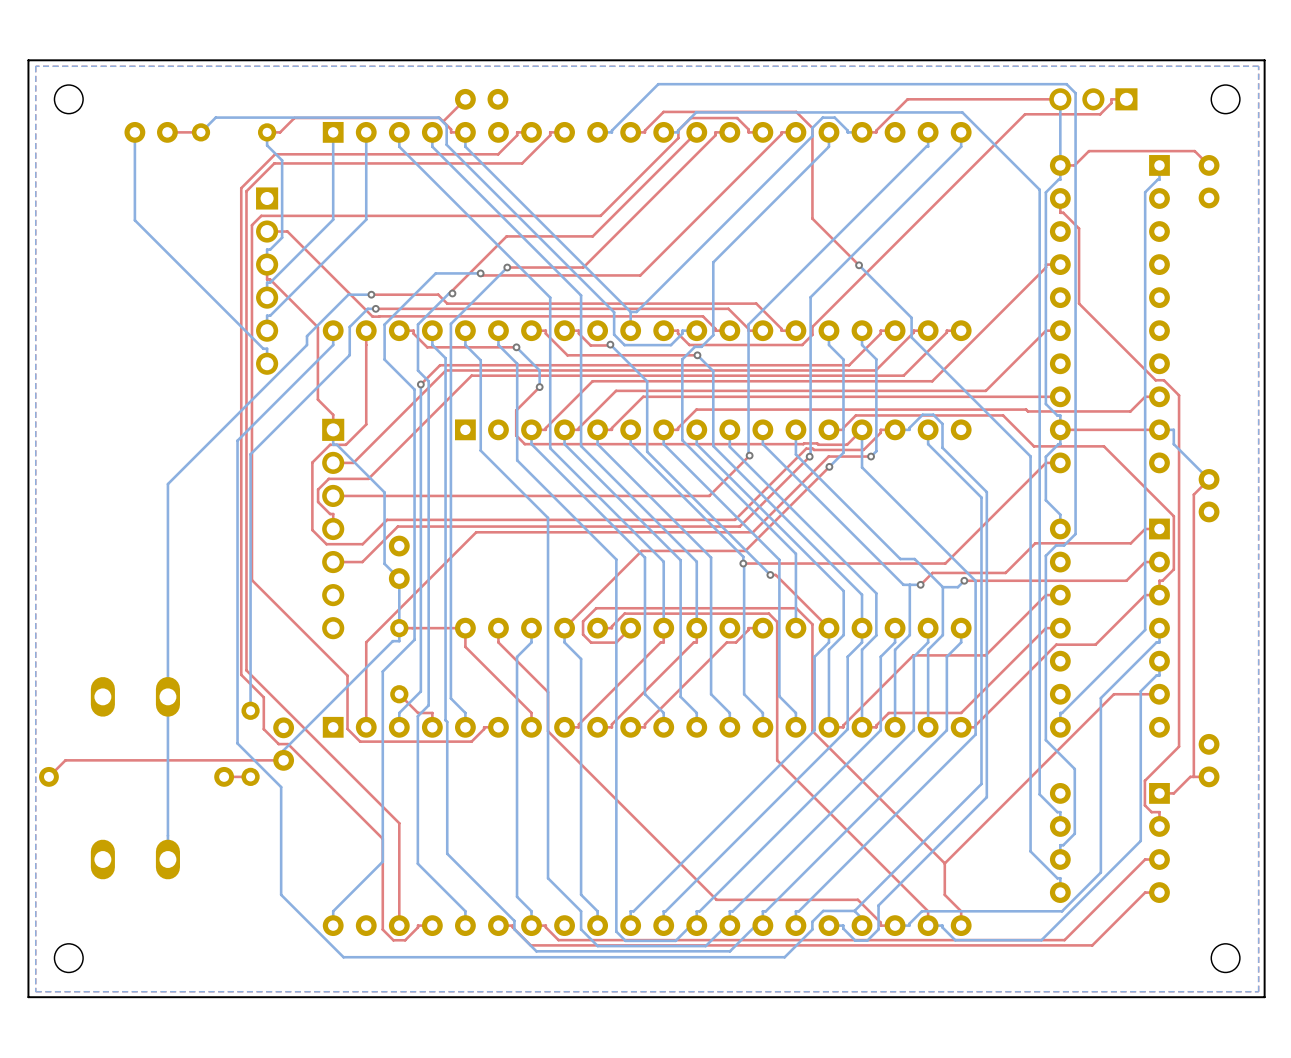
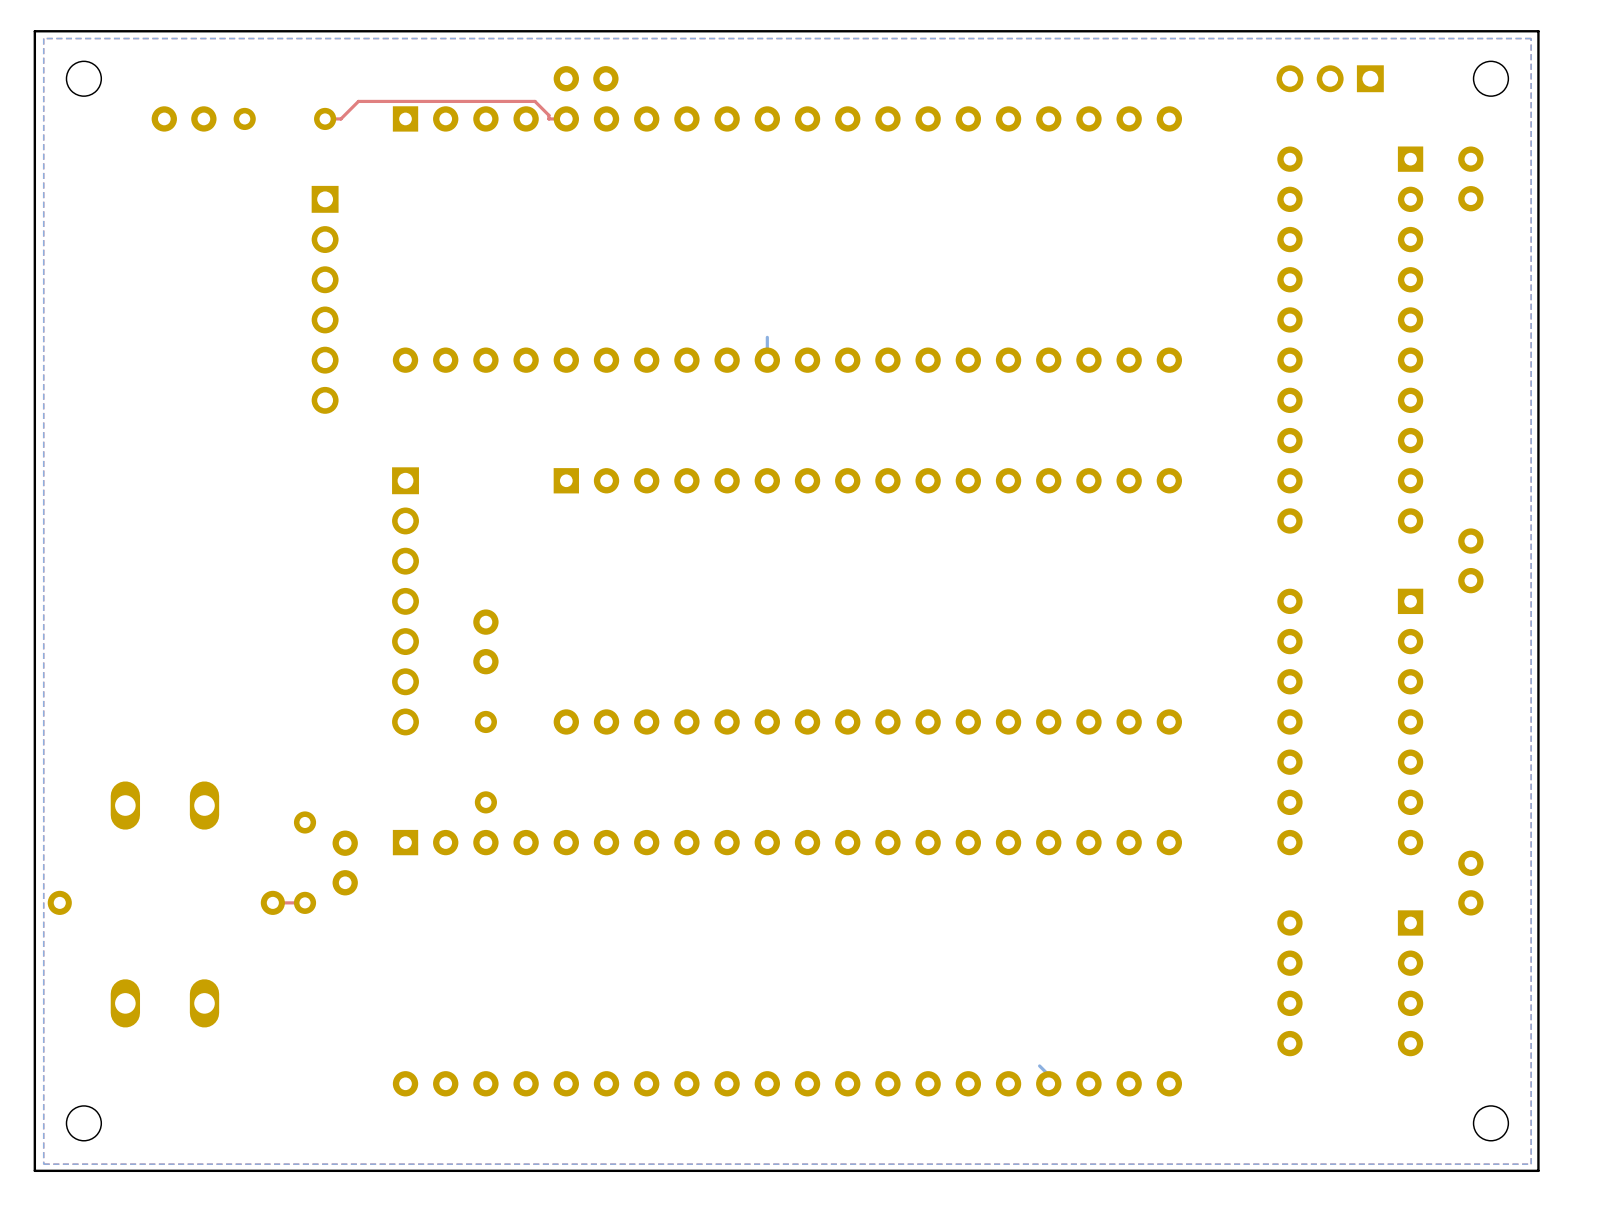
top track: (465, 99) (443, 121) -> none
top track: (1060, 99) (907, 99) (876, 132) (862, 132) -> none
bottom track: (1060, 99) (1060, 179) (1045, 192) (1045, 404) (1057, 415) (1060, 415) (1060, 444) (1045, 456) (1045, 500) (1060, 514) (1060, 529) -> none
top track: (1126, 99) (1111, 99) (1111, 103) (1100, 114) (1025, 114) (812, 326) (812, 334) (802, 345) (689, 345) (678, 333) (678, 330) (663, 330) -> none
bottom track: (134, 132) (134, 220) (263, 348) (267, 348) (267, 363) -> none
top track: (200, 132) (167, 132) -> none
bottom track: (200, 132) (215, 117) (438, 117) (446, 125) (446, 144) (614, 312) (614, 334) (624, 345) (670, 345) (682, 333) (682, 330) (696, 330) -> none
bottom track: (267, 132) (267, 145) (282, 160) (282, 237) (270, 249) (267, 249) (267, 264) -> none
bottom track: (333, 132) (333, 219) (270, 282) (267, 282) (267, 297) -> none
bottom track: (366, 132) (366, 219) (270, 315) (267, 315) (267, 330) -> none
bottom track: (399, 132) (399, 146) (550, 297) (550, 448) (663, 561) (663, 628) -> none
bottom track: (432, 132) (432, 146) (581, 295) (581, 446) (696, 561) (696, 628) -> none
top track: (531, 132) (517, 132) (517, 135) (498, 154) (275, 154) (241, 188) (241, 674) (263, 697) (263, 729) (278, 744) (288, 744) (382, 838) (382, 929) (393, 940) (405, 940) (418, 925) (432, 925) -> none
top track: (564, 132) (550, 132) (550, 135) (522, 163) (274, 163) (246, 191) (246, 670) (399, 823) (399, 925) -> none
bottom track: (597, 132) (611, 132) (658, 84) (1066, 84) (1075, 93) (1075, 534) (1064, 545) (1056, 545) (1045, 555) (1045, 740) (1074, 769) (1074, 833) (1063, 845) (1060, 845) (1060, 859) -> none
top track: (630, 132) (644, 132) (663, 111) (796, 111) (812, 128) (812, 218) (859, 265) -> none
bottom track: (663, 132) (678, 132) (696, 112) (962, 112) (1039, 189) (1039, 794) (1057, 812) (1060, 812) (1060, 826) -> none
top track: (696, 132) (592, 236) (506, 236) (452, 290) (452, 293) -> none
top track: (729, 132) (715, 132) (715, 135) (583, 267) (507, 267) -> none
top track: (762, 132) (748, 132) (748, 129) (737, 118) (690, 118) (678, 130) (678, 138) (600, 215) (261, 215) (251, 225) (251, 580) (347, 675) (347, 728) (360, 741) (471, 741) (484, 727) (498, 727) -> none
top track: (795, 132) (781, 132) (640, 275) (482, 275) (480, 273) -> none
bottom track: (828, 132) (828, 146) (713, 262) (713, 335) (701, 346) (694, 346) (682, 359) (682, 440) (795, 553) (795, 628) -> none
bottom track: (862, 132) (847, 132) (834, 117) (822, 117) (812, 127) (812, 136) (636, 311) (630, 311) (465, 146) (465, 132) -> none
bottom track: (928, 132) (928, 146) (748, 324) (749, 455) -> none
bottom track: (961, 132) (961, 146) (810, 297) (809, 456) -> none
bottom track: (1159, 165) (1159, 179) (1145, 192) (1145, 629) (1060, 712) (1060, 727) -> none
top track: (1209, 165) (1194, 151) (1088, 151) (1074, 165) (1060, 165) -> none
top track: (1060, 198) (1060, 212) (1063, 212) (1079, 228) (1079, 303) (1155, 380) (1163, 380) (1179, 395) (1179, 746) (1144, 780) (1144, 805) (1151, 812) (1159, 812) (1159, 826) -> none
top track: (267, 231) (287, 231) (372, 316) (702, 316) (715, 330) (729, 330) -> none
top track: (267, 264) (267, 279) (270, 279) (317, 327) (317, 399) (333, 414) (333, 429) -> none
top track: (1060, 264) (1046, 264) (1046, 267) (932, 381) (592, 381) (545, 429) (531, 429) -> none
bottom track: (859, 265) (911, 317) (911, 337) (1030, 456) (1030, 851) (1057, 878) (1060, 878) (1060, 892) -> none
via: (859, 265) -> none
bottom track: (507, 267) (450, 323) (450, 698) (465, 712) (465, 727) -> none
via: (507, 267) -> none
bottom track: (480, 273) (435, 273) (384, 324) (384, 359) (414, 389) (414, 639) (382, 671) (382, 861) (333, 911) (333, 925) -> none
via: (480, 273) -> none
bottom track: (452, 293) (449, 293) (417, 324) (417, 370) (428, 381) (428, 705) (417, 716) (417, 863) (465, 911) (465, 925) -> none
via: (452, 293) -> none
top track: (371, 294) (438, 294) (447, 303) (756, 303) (781, 330) (795, 330) -> none
bottom track: (371, 294) (348, 294) (307, 336) (307, 345) (167, 484) (167, 859) -> none
via: (371, 294) -> none
top track: (375, 308) (728, 308) (748, 330) (762, 330) -> none
bottom track: (375, 308) (367, 308) (349, 326) (349, 355) (250, 454) (250, 710) -> none
via: (375, 308) -> none
bottom track: (333, 330) (333, 345) (237, 440) (237, 743) (281, 787) (281, 894) (343, 957) (784, 957) (812, 929) (812, 921) (823, 910) (854, 910) (981, 783) (981, 497) (928, 444) (928, 429) -> none
top track: (366, 330) (366, 424) (345, 444) (330, 444) (312, 462) (312, 530) (326, 544) (362, 544) (387, 519) (735, 519) (806, 448) (863, 449) (880, 432) (880, 429) (895, 429) -> none
top track: (399, 330) (413, 330) (413, 333) (427, 347) (516, 347) -> none
bottom track: (432, 330) (432, 345) (445, 358) (447, 853) (514, 920) (514, 929) (536, 951) (730, 951) (762, 918) -> none
bottom track: (465, 330) (465, 345) (480, 360) (480, 450) (548, 517) (548, 878) (581, 911) (581, 929) (597, 946) (705, 946) (729, 922) -> none
bottom track: (498, 330) (498, 345) (517, 363) (517, 460) (616, 559) (616, 931) (625, 940) (675, 940) (696, 919) -> none
top track: (531, 330) (545, 330) (545, 333) (567, 355) (697, 355) -> none
top track: (564, 330) (578, 330) (578, 333) (590, 345) (610, 344) -> none
bottom track: (828, 330) (828, 345) (843, 359) (843, 452) (829, 466) -> none
bottom track: (862, 330) (862, 345) (876, 359) (876, 451) (871, 456) -> none
top track: (895, 330) (880, 330) (880, 333) (849, 365) (440, 365) (420, 384) -> none
top track: (928, 330) (913, 330) (875, 370) (445, 370) (353, 462) (333, 462) -> none
top track: (961, 330) (946, 330) (903, 375) (471, 375) (368, 478) (328, 478) (318, 489) (318, 502) (330, 514) (333, 514) (333, 529) -> none
top track: (1060, 330) (1046, 330) (985, 390) (616, 390) (578, 429) (564, 429) -> none
bottom track: (610, 344) (647, 381) (647, 451) (770, 574) -> none
via: (610, 344) -> none
bottom track: (516, 347) (539, 370) (539, 387) -> none
via: (516, 347) -> none
bottom track: (697, 355) (713, 371) (713, 446) (862, 594) (862, 642) (847, 656) (847, 729) (663, 911) (663, 925) -> none
via: (697, 355) -> none
bottom track: (420, 384) (420, 691) (399, 712) (399, 727) -> none
via: (420, 384) -> none
top track: (539, 387) (516, 410) (516, 435) (524, 444) (847, 444) (862, 429) -> none
via: (539, 387) -> none
top track: (1060, 396) (643, 396) (611, 429) (597, 429) -> none
top track: (1159, 396) (1145, 396) (1130, 411) (696, 409) (678, 429) (663, 429) -> none
bottom track: (333, 429) (333, 444) (336, 444) (384, 492) (384, 563) (399, 578) (399, 641) (392, 641) (283, 750) (283, 760) -> none
bottom track: (531, 429) (531, 444) (644, 557) (644, 694) (663, 712) (663, 727) -> none
bottom track: (564, 429) (564, 444) (680, 560) (680, 696) (696, 712) (696, 727) -> none
bottom track: (597, 429) (597, 444) (711, 557) (711, 694) (729, 712) (729, 727) -> none
bottom track: (630, 429) (630, 444) (743, 556) (744, 694) (762, 712) (762, 727) -> none
bottom track: (663, 429) (663, 444) (779, 559) (779, 696) (795, 712) (795, 727) -> none
bottom track: (696, 429) (696, 444) (843, 591) (843, 635) (828, 649) (828, 727) -> none
bottom track: (729, 429) (729, 446) (876, 593) (876, 635) (862, 649) (862, 727) -> none
bottom track: (762, 429) (762, 444) (903, 584) (920, 584) -> none
bottom track: (795, 429) (795, 454) (900, 559) (914, 559) (942, 587) -> none
top track: (828, 429) (843, 429) (855, 415) (1003, 415) (1034, 446) (1103, 446) (1173, 516) (1173, 569) (1162, 580) (1159, 580) (1159, 595) (1145, 595) (1095, 644) (1056, 644) (975, 727) (961, 727) -> none
bottom track: (862, 429) (862, 467) (975, 580) (975, 734) (798, 911) (795, 911) (795, 925) -> none
bottom track: (895, 429) (909, 429) (922, 414) (933, 414) (942, 423) (942, 447) (986, 492) (986, 797) (878, 905) (878, 929) (867, 940) (855, 940) (843, 928) (843, 925) (828, 925) -> none
top track: (1159, 429) (1060, 429) -> none
bottom track: (1159, 429) (1173, 429) (1173, 444) (1209, 479) -> none
top track: (749, 455) (709, 495) (333, 495) -> none
via: (749, 455) -> none
top track: (809, 456) (739, 526) (397, 526) (362, 562) (333, 562) -> none
via: (809, 456) -> none
top track: (871, 456) (828, 456) (752, 532) (476, 532) (366, 642) (366, 727) -> none
via: (871, 456) -> none
top track: (1060, 462) (1046, 462) (945, 563) (743, 563) -> none
top track: (829, 466) (745, 550) (641, 550) (564, 628) -> none
via: (829, 466) -> none
top track: (1209, 479) (1193, 494) (1193, 776) -> none
top track: (1159, 529) (1145, 529) (1130, 543) (1035, 543) (1005, 572) (932, 572) (920, 584) -> none
top track: (1159, 562) (1145, 562) (1126, 580) (964, 580) -> none
via: (743, 563) -> none
top track: (770, 574) (775, 574) (828, 628) -> none
via: (770, 574) -> none
bottom track: (964, 580) (957, 587) (942, 587) -> none
via: (964, 580) -> none
bottom track: (909, 584) (909, 635) (895, 649) (895, 727) -> none
via: (920, 584) -> none
bottom track: (942, 587) (942, 635) (928, 649) (928, 727) -> none
top track: (1060, 595) (1046, 595) (985, 655) (913, 655) (843, 727) (828, 727) -> none
top track: (399, 628) (465, 628) (465, 646) (531, 712) (531, 727) -> none
top track: (498, 628) (498, 642) (548, 692) (548, 731) (716, 899) (857, 899) (880, 922) (880, 925) (895, 925) -> none
bottom track: (531, 628) (531, 642) (517, 656) (517, 896) (531, 911) (531, 925) -> none
bottom track: (564, 628) (564, 642) (581, 658) (581, 894) (597, 911) (597, 925) -> none
top track: (597, 628) (611, 628) (624, 613) (768, 613) (777, 621) (777, 760) (928, 911) (928, 925) -> none
top track: (630, 628) (616, 642) (591, 642) (583, 634) (583, 621) (596, 608) (796, 608) (812, 624) (812, 731) (944, 863) -> none
top track: (663, 628) (663, 642) (660, 642) (578, 724) (578, 727) (564, 727) -> none
top track: (696, 628) (696, 642) (693, 642) (611, 724) (611, 727) (597, 727) -> none
top track: (762, 628) (748, 628) (736, 642) (726, 642) (644, 724) (644, 727) (630, 727) -> none
bottom track: (828, 628) (828, 642) (814, 656) (814, 730) (633, 911) (630, 911) (630, 925) -> none
bottom track: (895, 628) (895, 642) (880, 656) (880, 730) (699, 911) (696, 911) (696, 925) -> none
bottom track: (928, 628) (928, 642) (913, 656) (913, 730) (732, 911) (729, 911) (729, 925) -> none
bottom track: (961, 628) (961, 642) (946, 656) (946, 730) (765, 911) (762, 911) (762, 925) -> none
top track: (1060, 628) (1046, 628) (961, 712) (888, 712) (876, 727) (862, 727) -> none
bottom track: (1159, 628) (1159, 642) (1156, 642) (1100, 698) (1100, 872) (1062, 911) (921, 911) (909, 925) (895, 925) -> none
bottom track: (1159, 661) (1159, 675) (1156, 675) (1140, 691) (1140, 840) (1041, 940) (955, 940) (942, 925) (928, 925) -> none
top track: (399, 694) (418, 712) (432, 712) (432, 727) -> none
top track: (1159, 694) (1113, 694) (944, 863) -> none
top track: (283, 760) (65, 760) (48, 776) -> none
top track: (1209, 776) (1190, 776) (1173, 793) (1159, 793) -> none
top track: (1159, 859) (1145, 859) (1064, 940) (558, 940) (545, 925) (531, 925) -> none
top track: (944, 863) (944, 894) (961, 911) (961, 925) -> none
top track: (1159, 892) (1145, 892) (1092, 945) (530, 945) (512, 925) (498, 925) -> none

